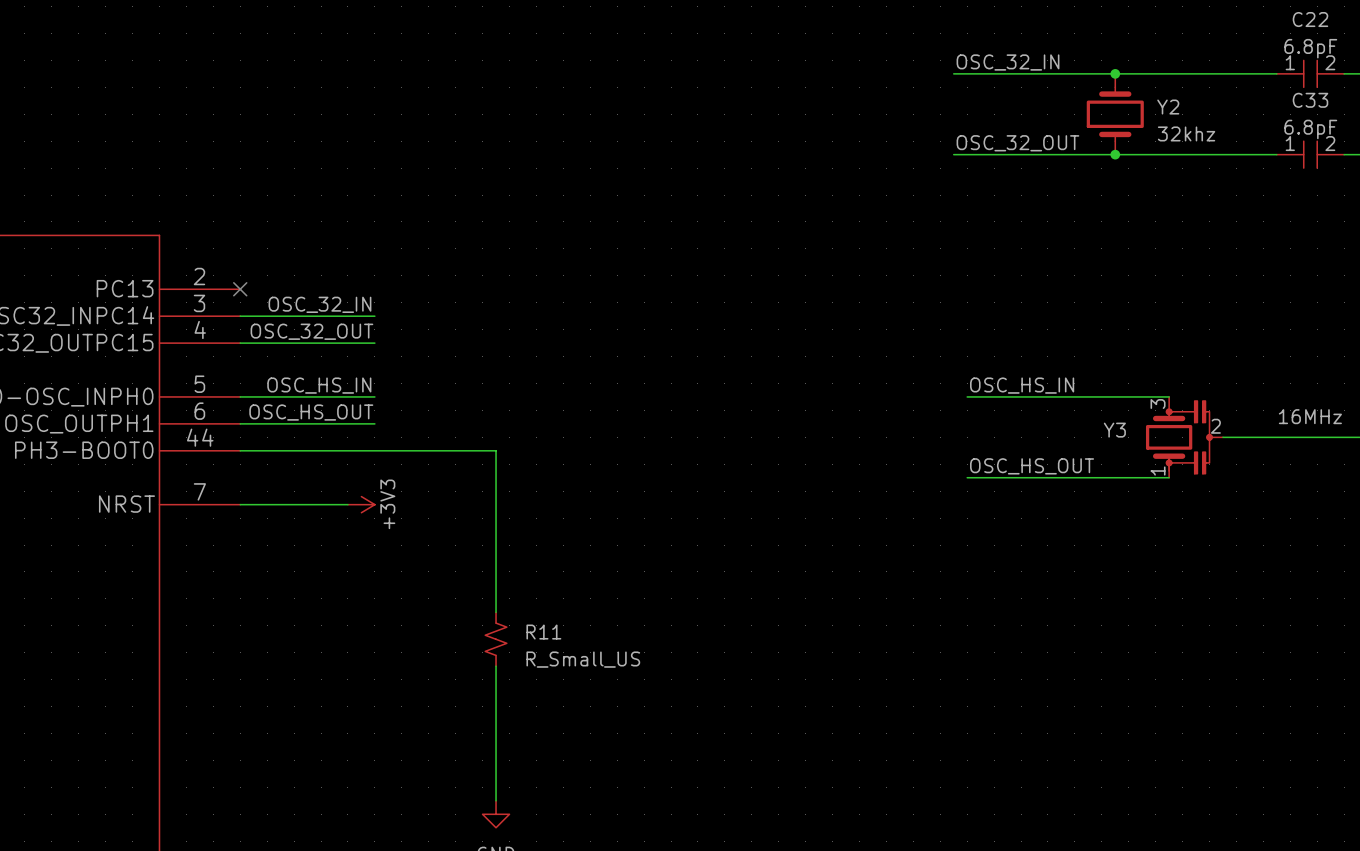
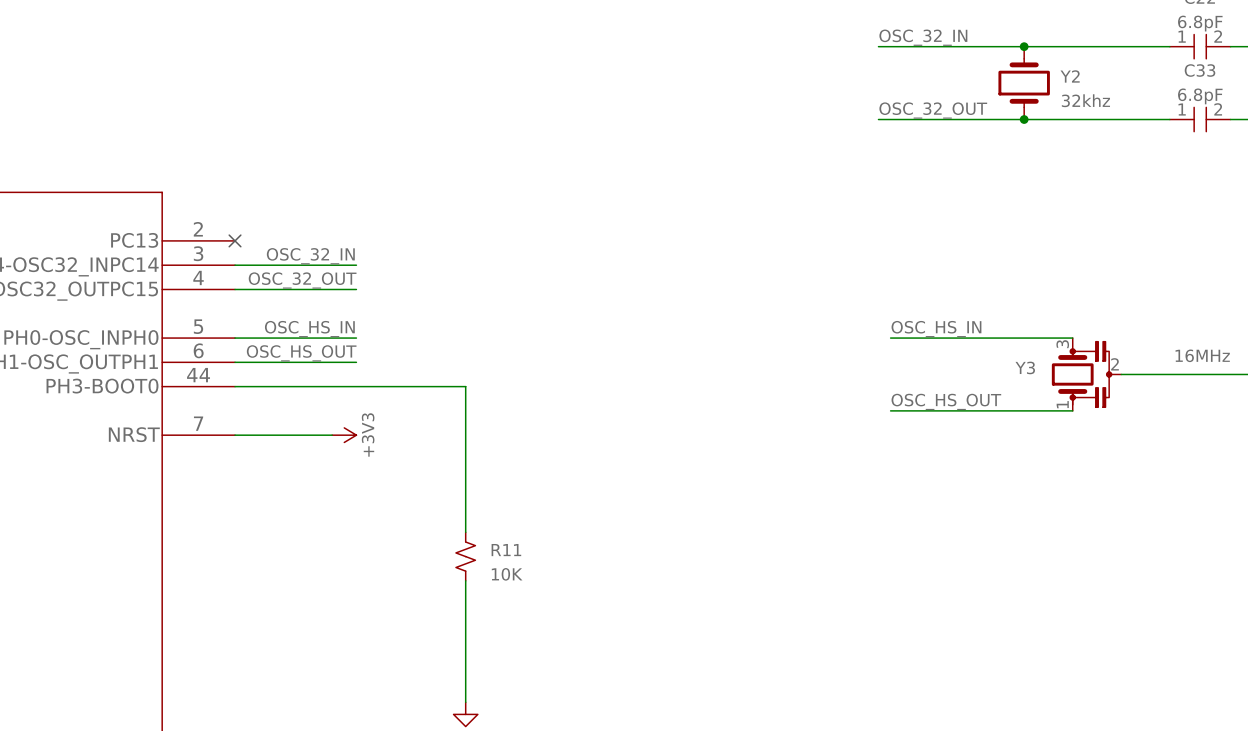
R11 value: R_Small_US (583, 659) -> 10K (507, 574)

